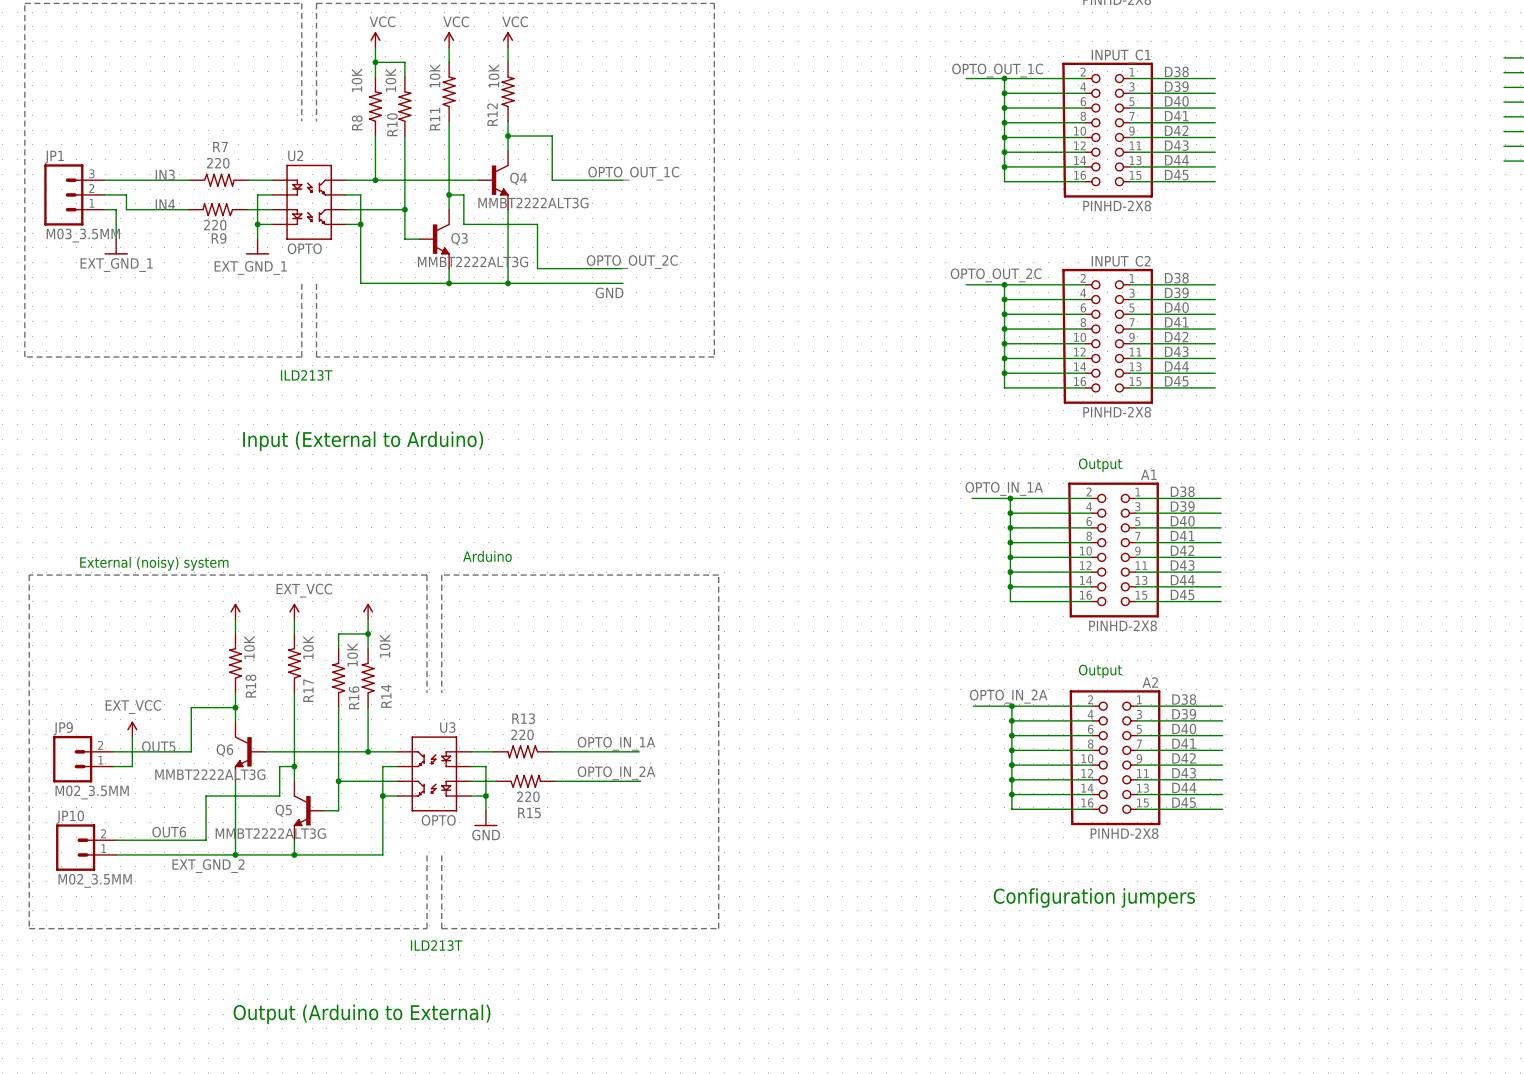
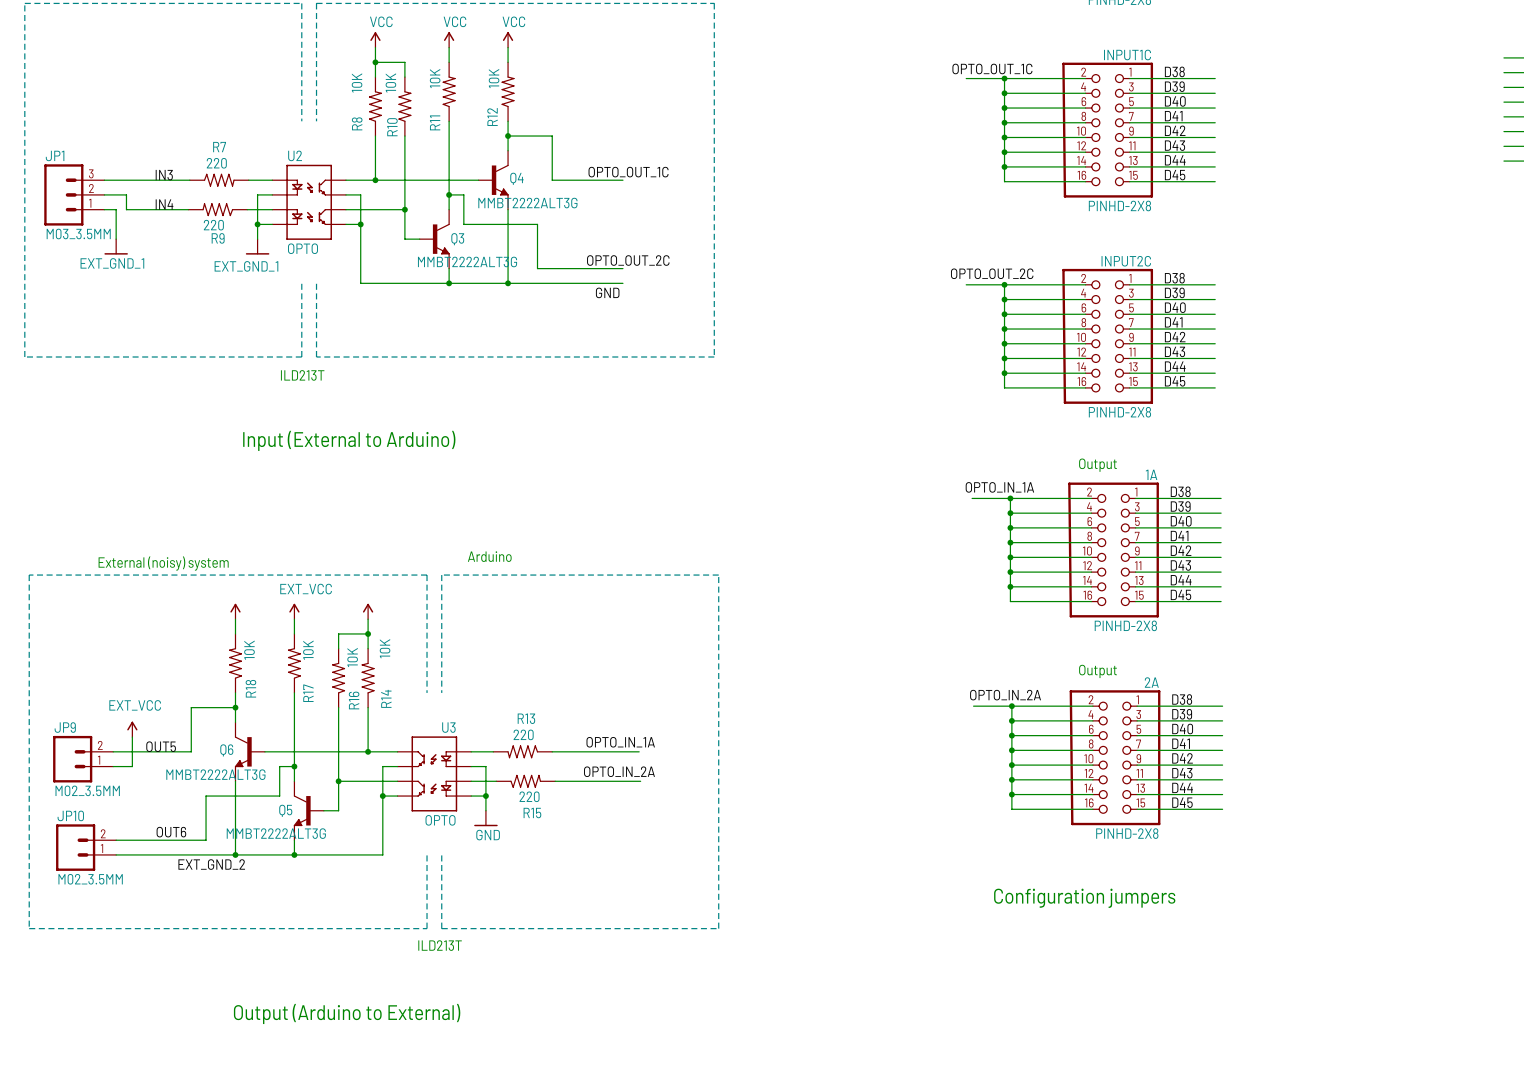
INPUT_C1 name: INPUT_C1 (1121, 56) -> INPUT1C (1127, 54)
INPUT_C2 name: INPUT_C2 (1121, 262) -> INPUT2C (1126, 261)
A1 name: A1 (1148, 474) -> 1A (1151, 474)
A2 name: A2 (1150, 682) -> 2A (1151, 682)

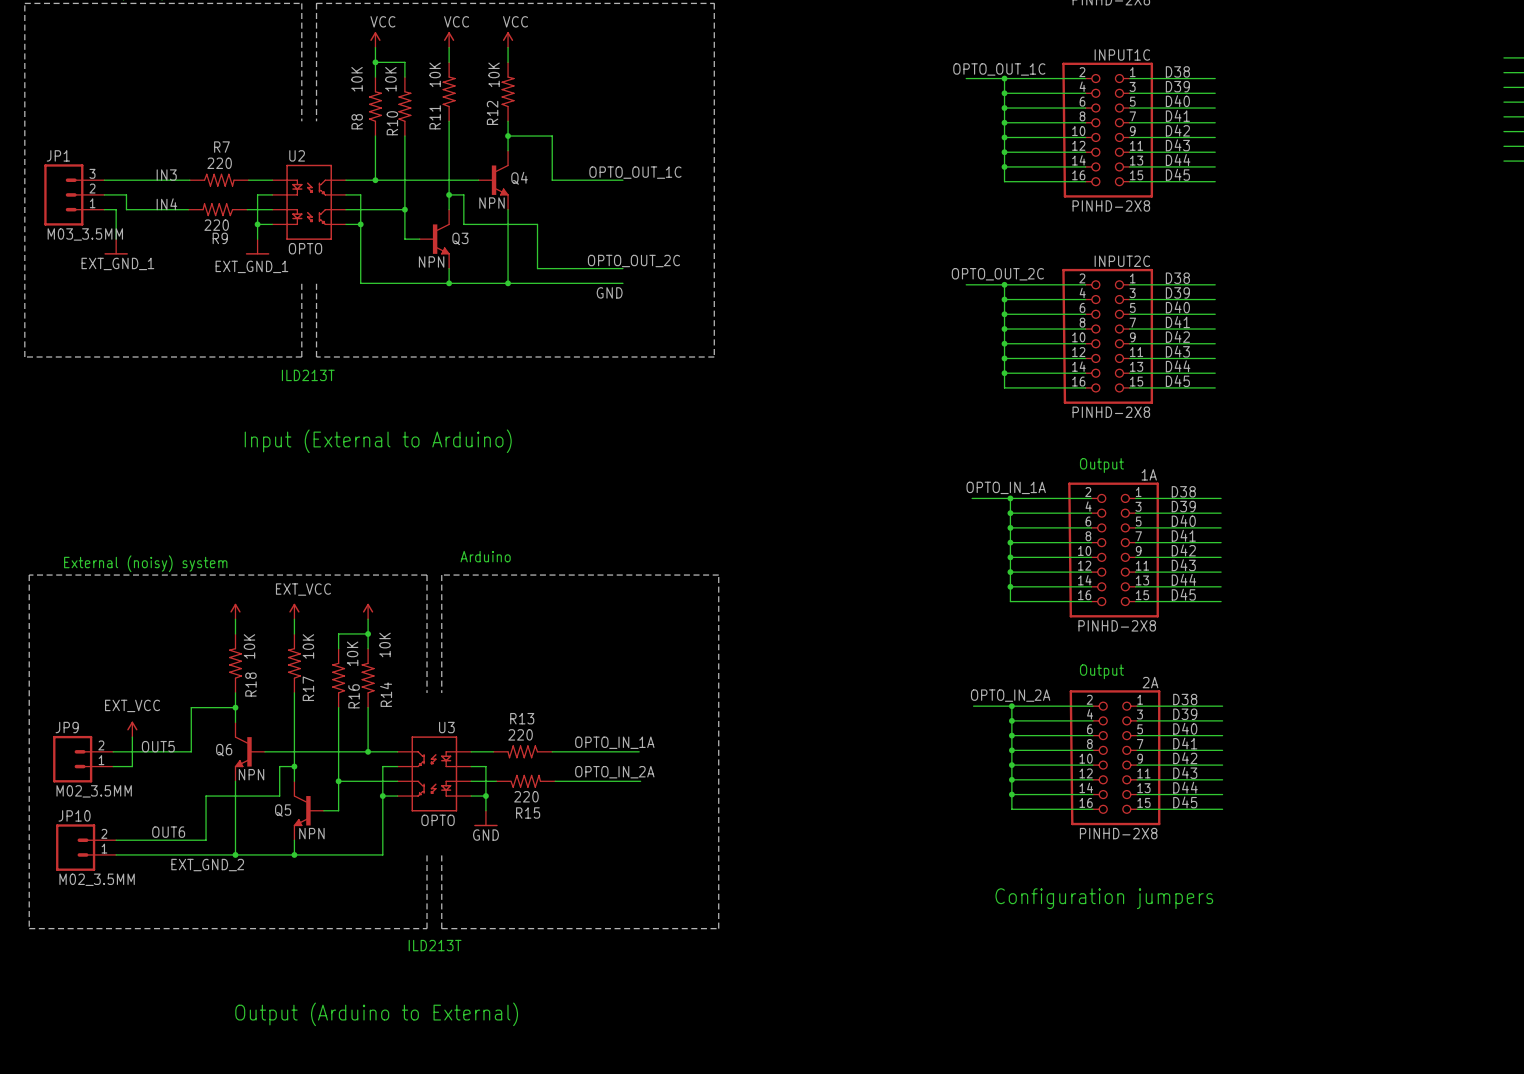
Q4 value: MMBT2222ALT3G (527, 203) -> NPN (492, 203)
Q3 value: MMBT2222ALT3G (467, 261) -> NPN (431, 261)
Q6 value: MMBT2222ALT3G (215, 774) -> NPN (251, 774)
Q5 value: MMBT2222ALT3G (276, 833) -> NPN (311, 833)

